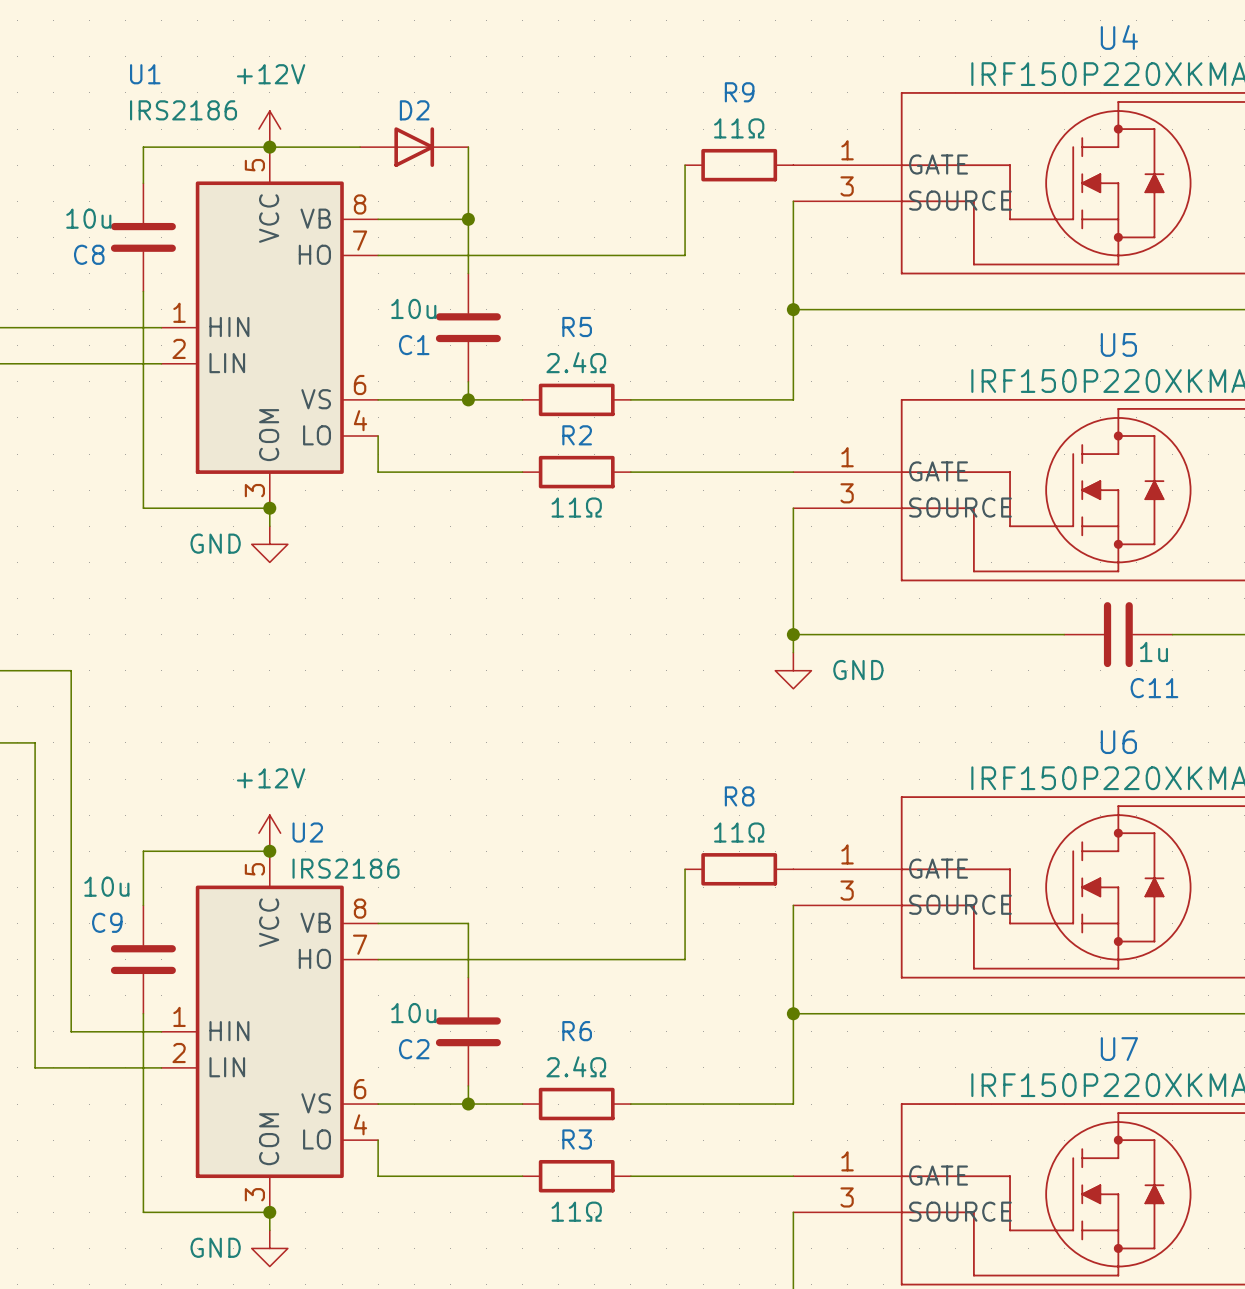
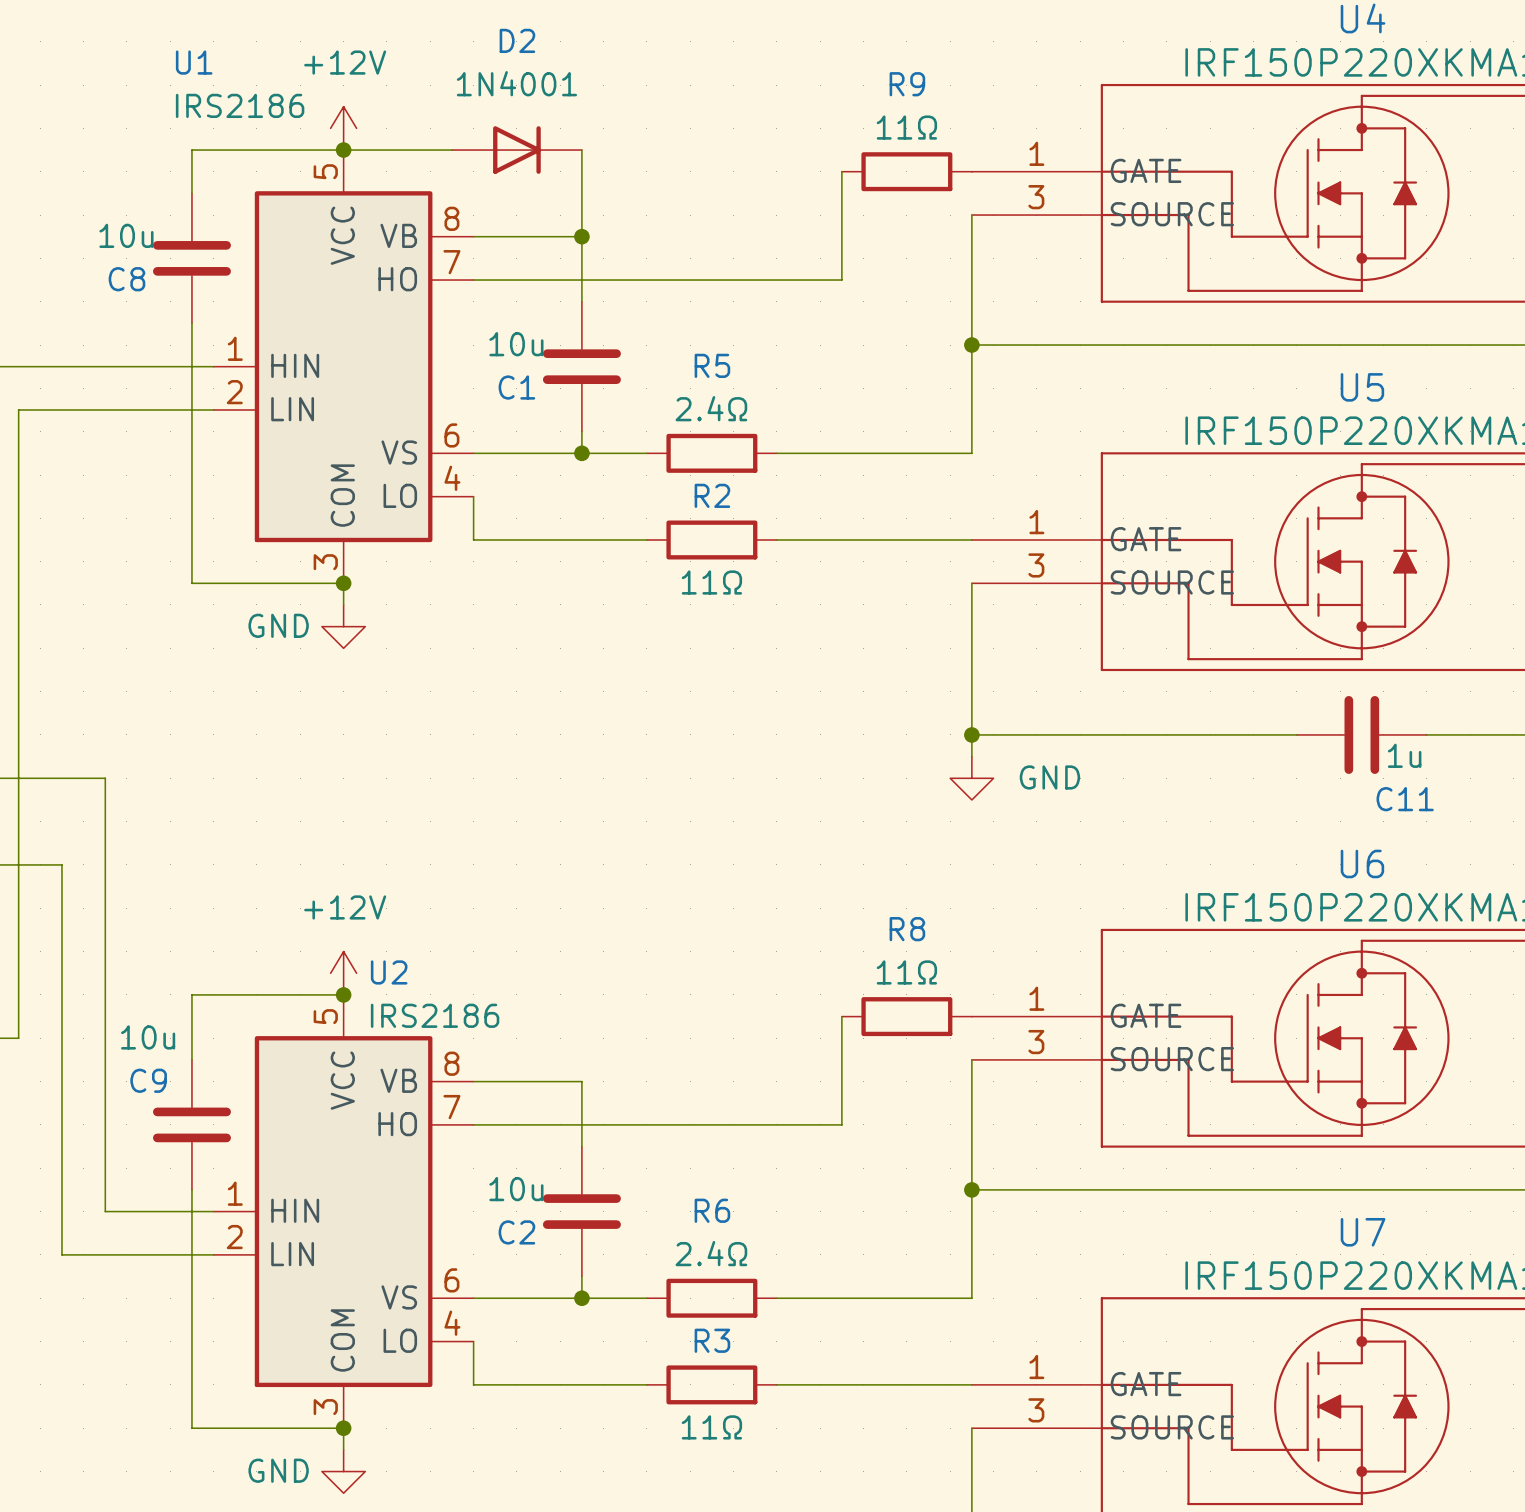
D2 value: none -> 1N4001 (516, 83)
D2 name position: D2 (414, 110) -> D2 (517, 40)

